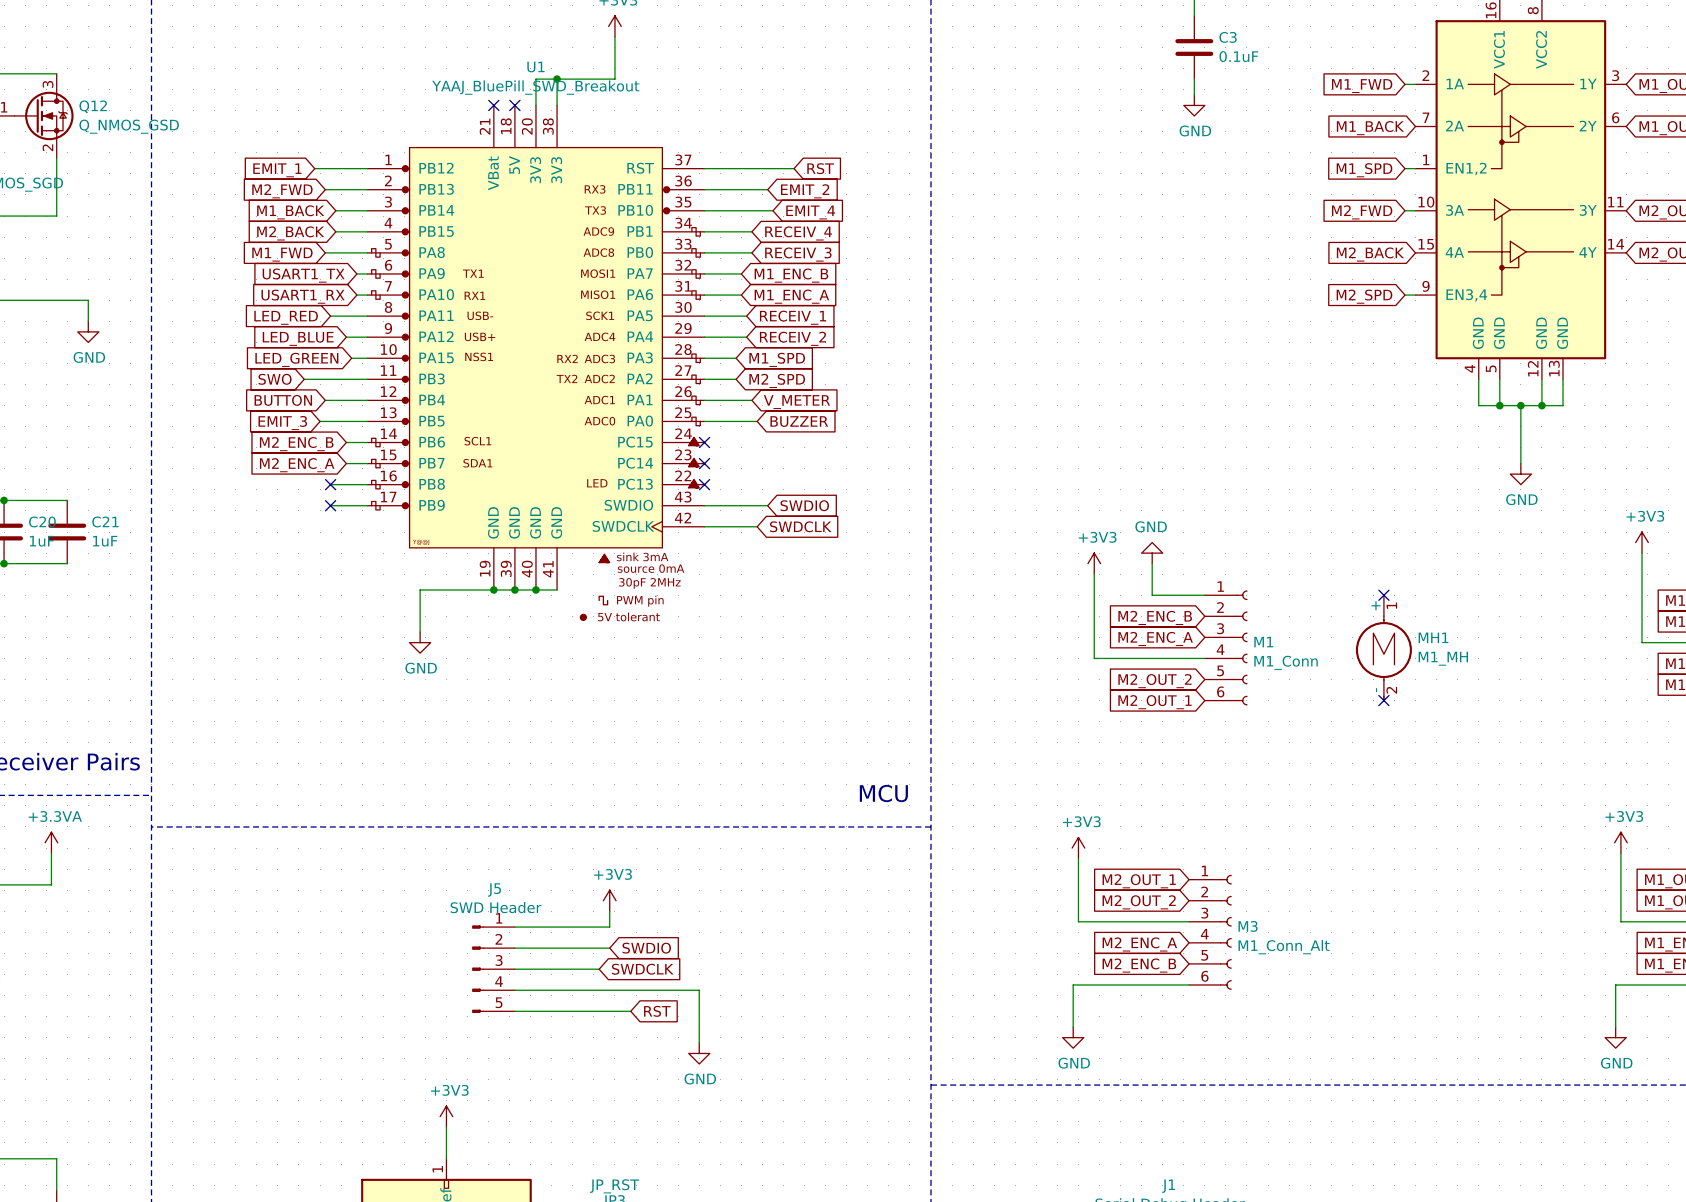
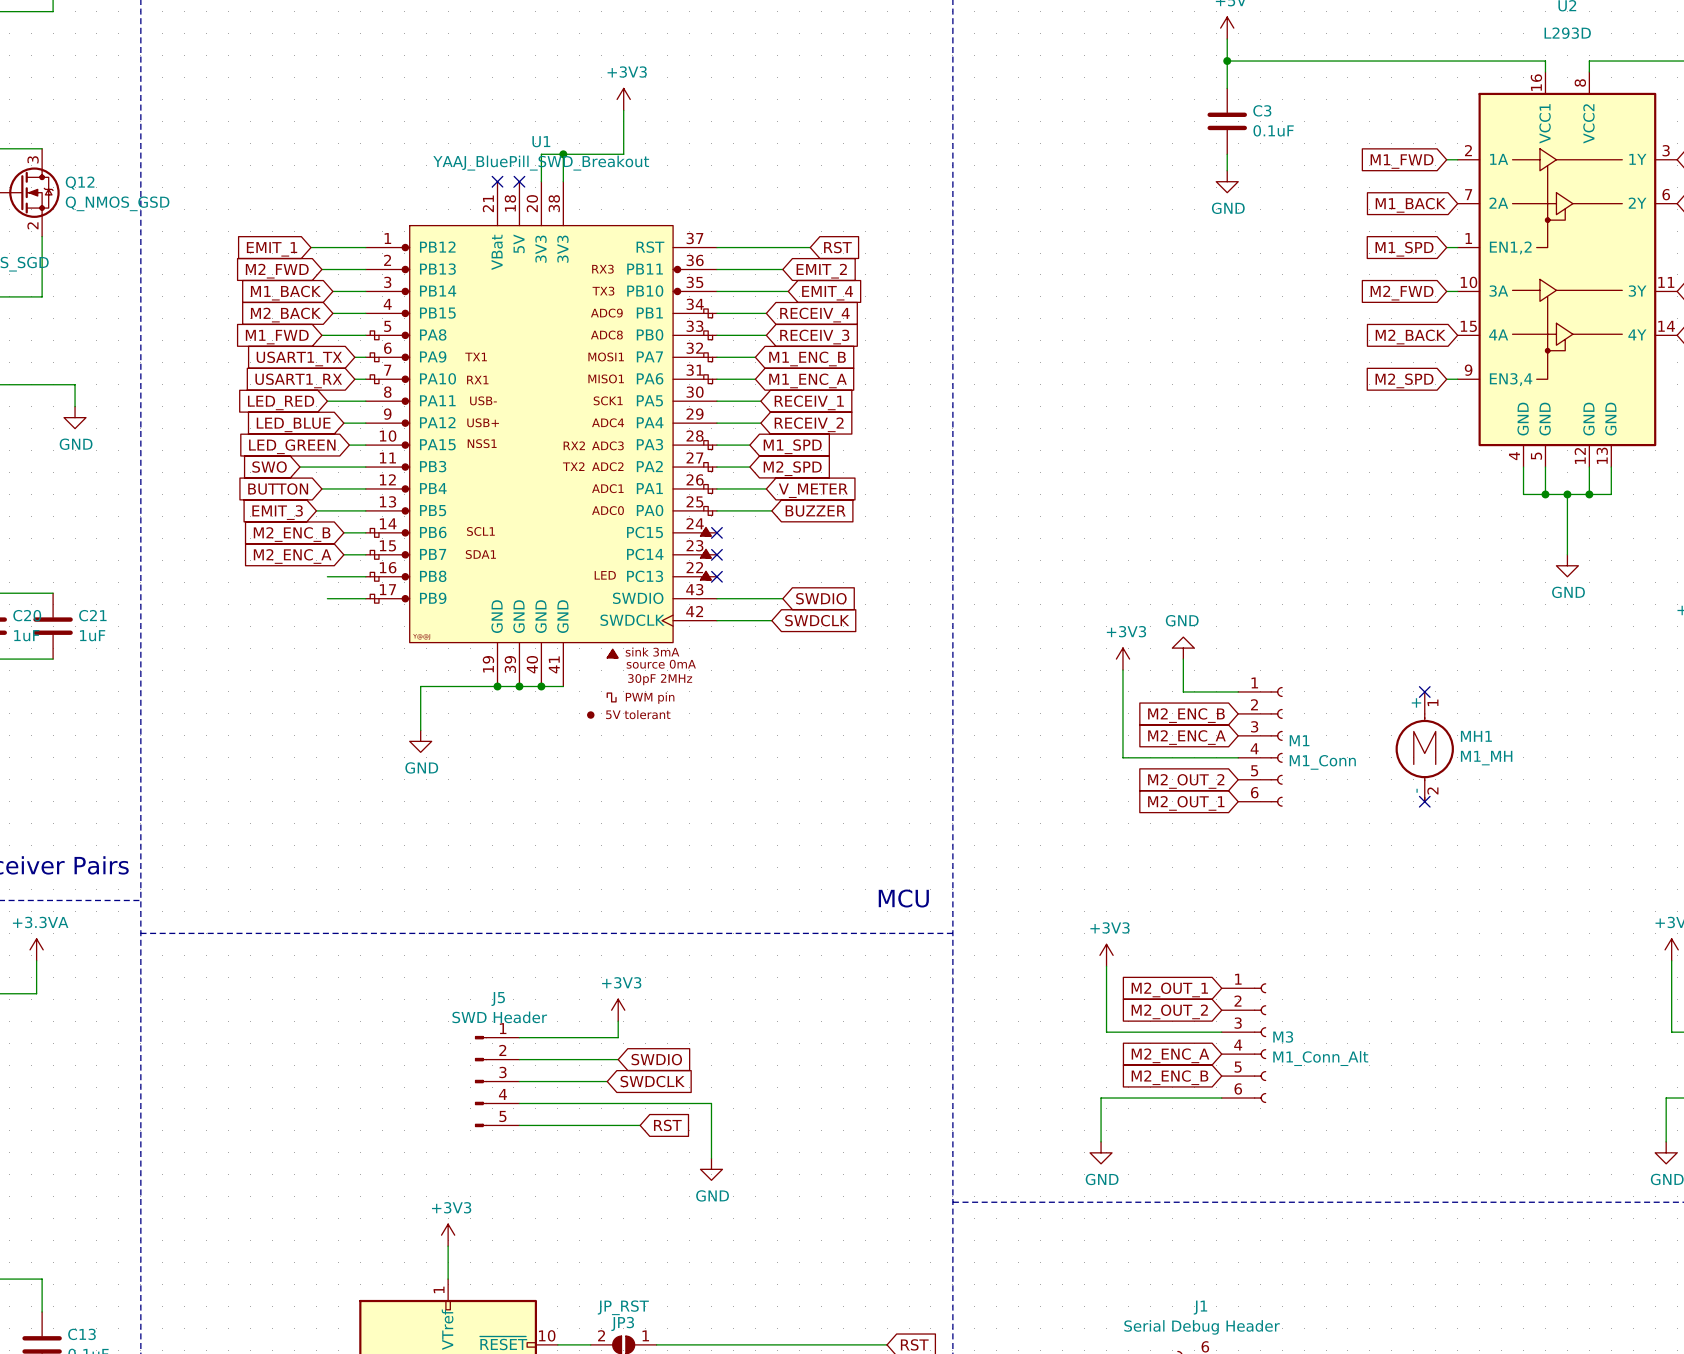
no-connect mark: (330, 484) -> none
no-connect mark: (330, 505) -> none

